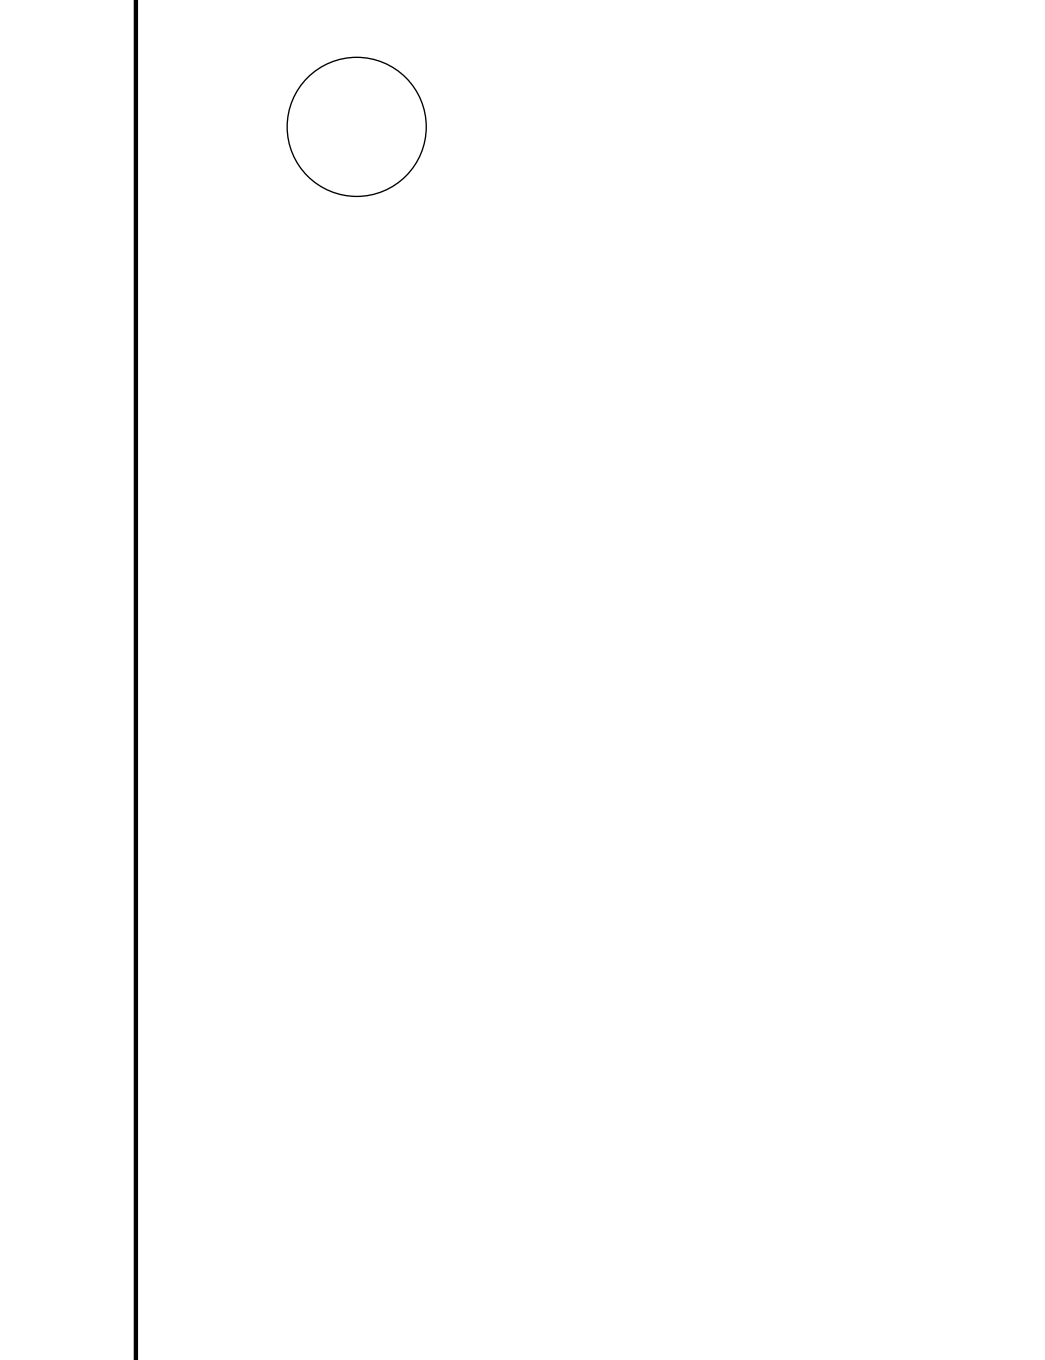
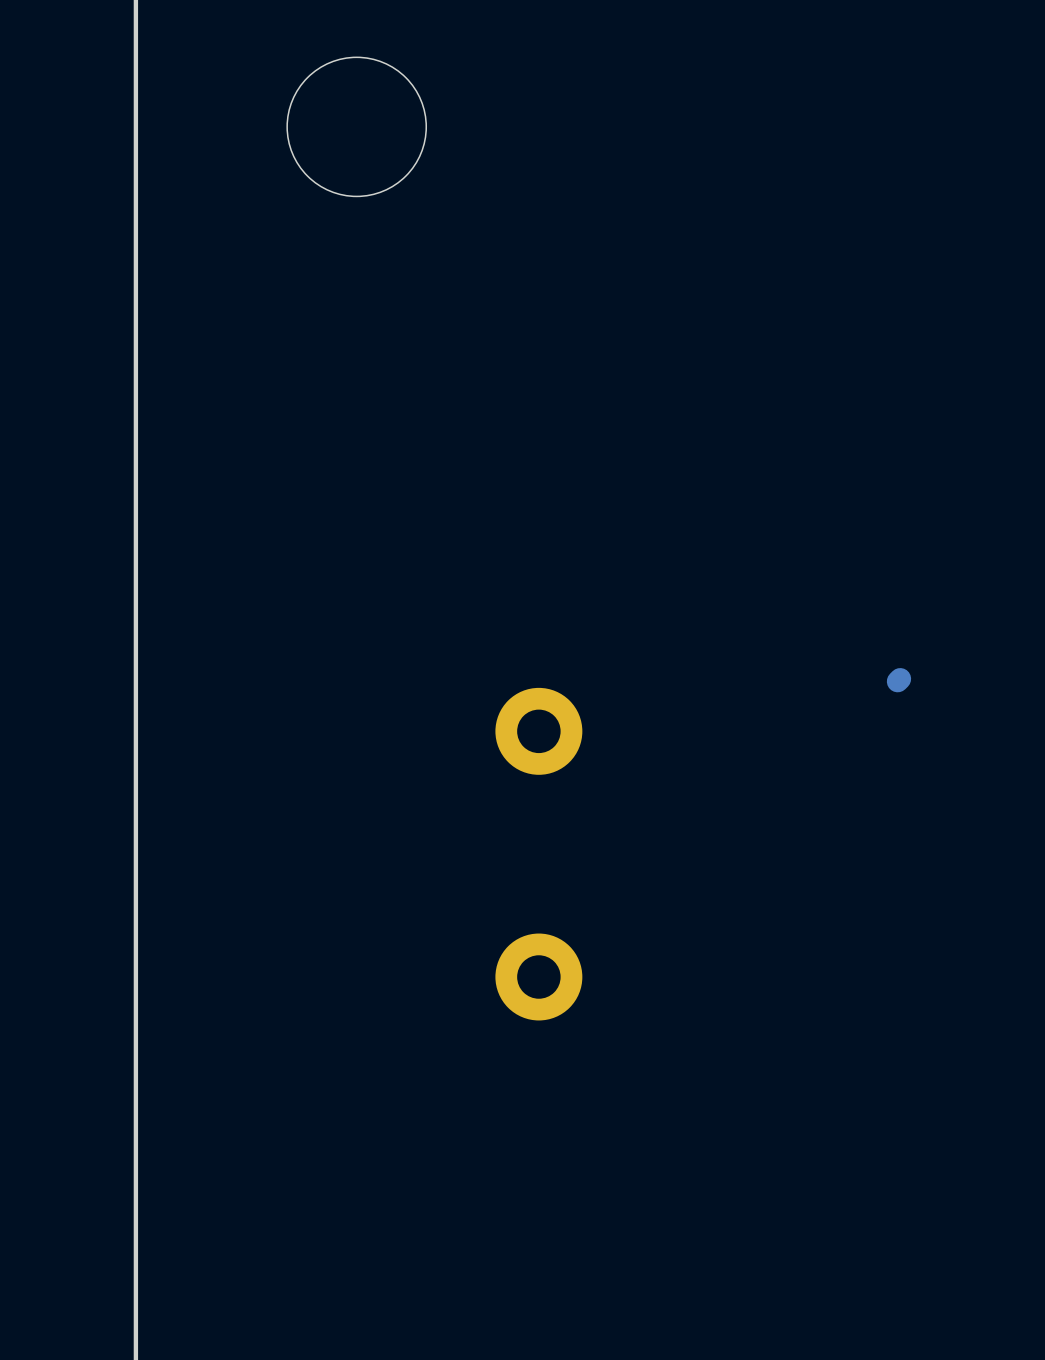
track: none -> (900, 678) (897, 681)
part: none -> (538, 731)
part: none -> (538, 977)

